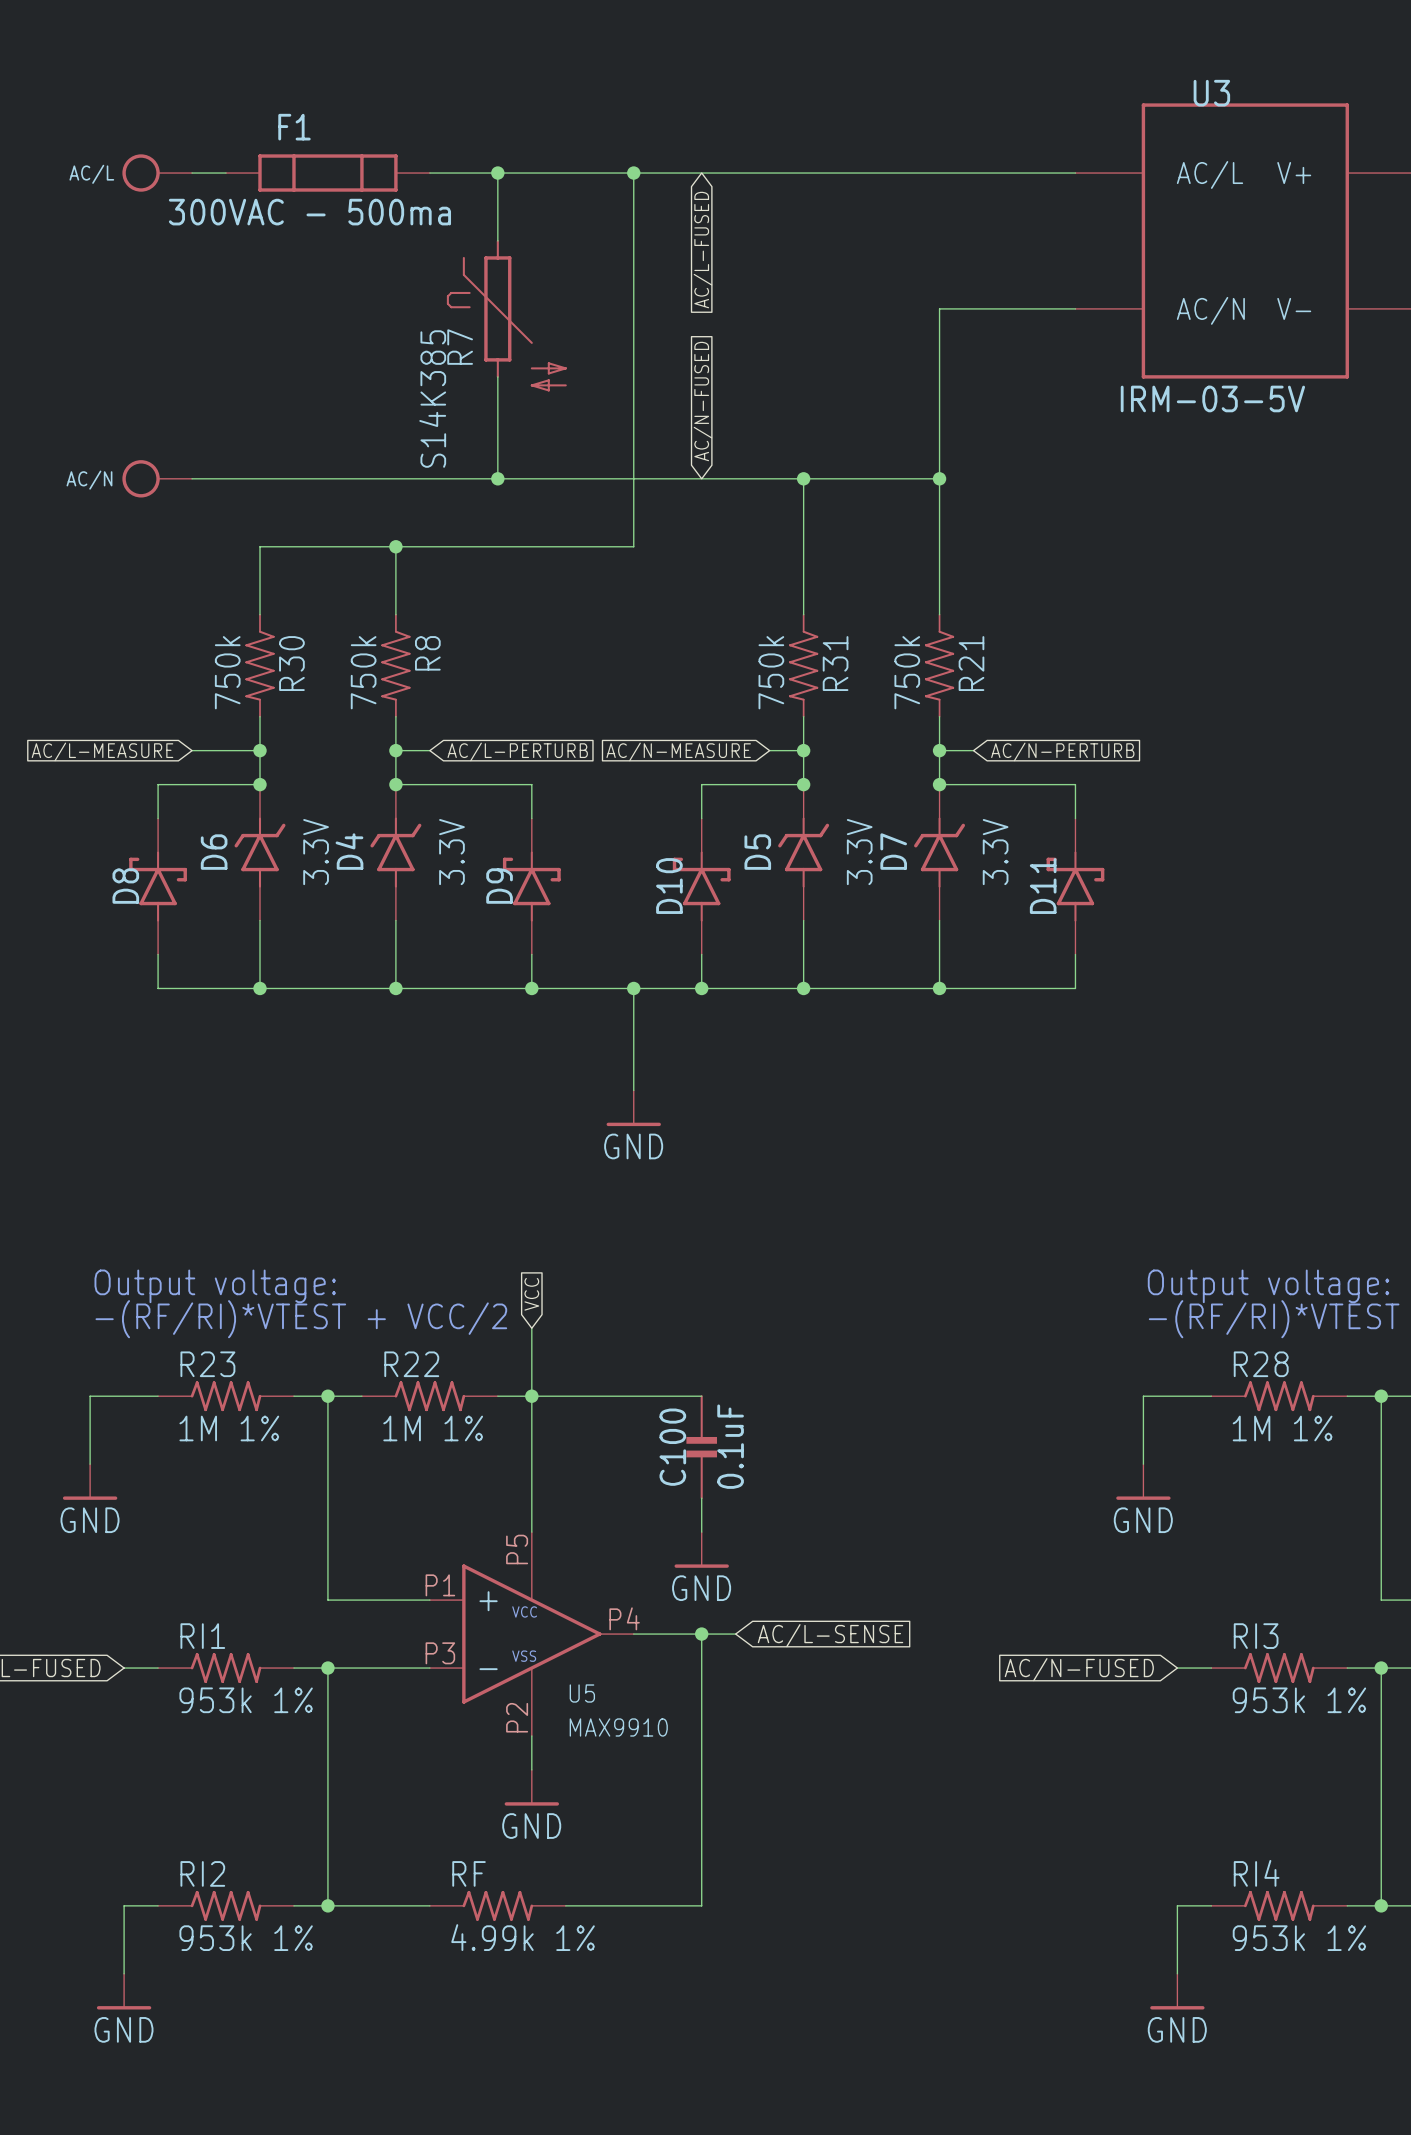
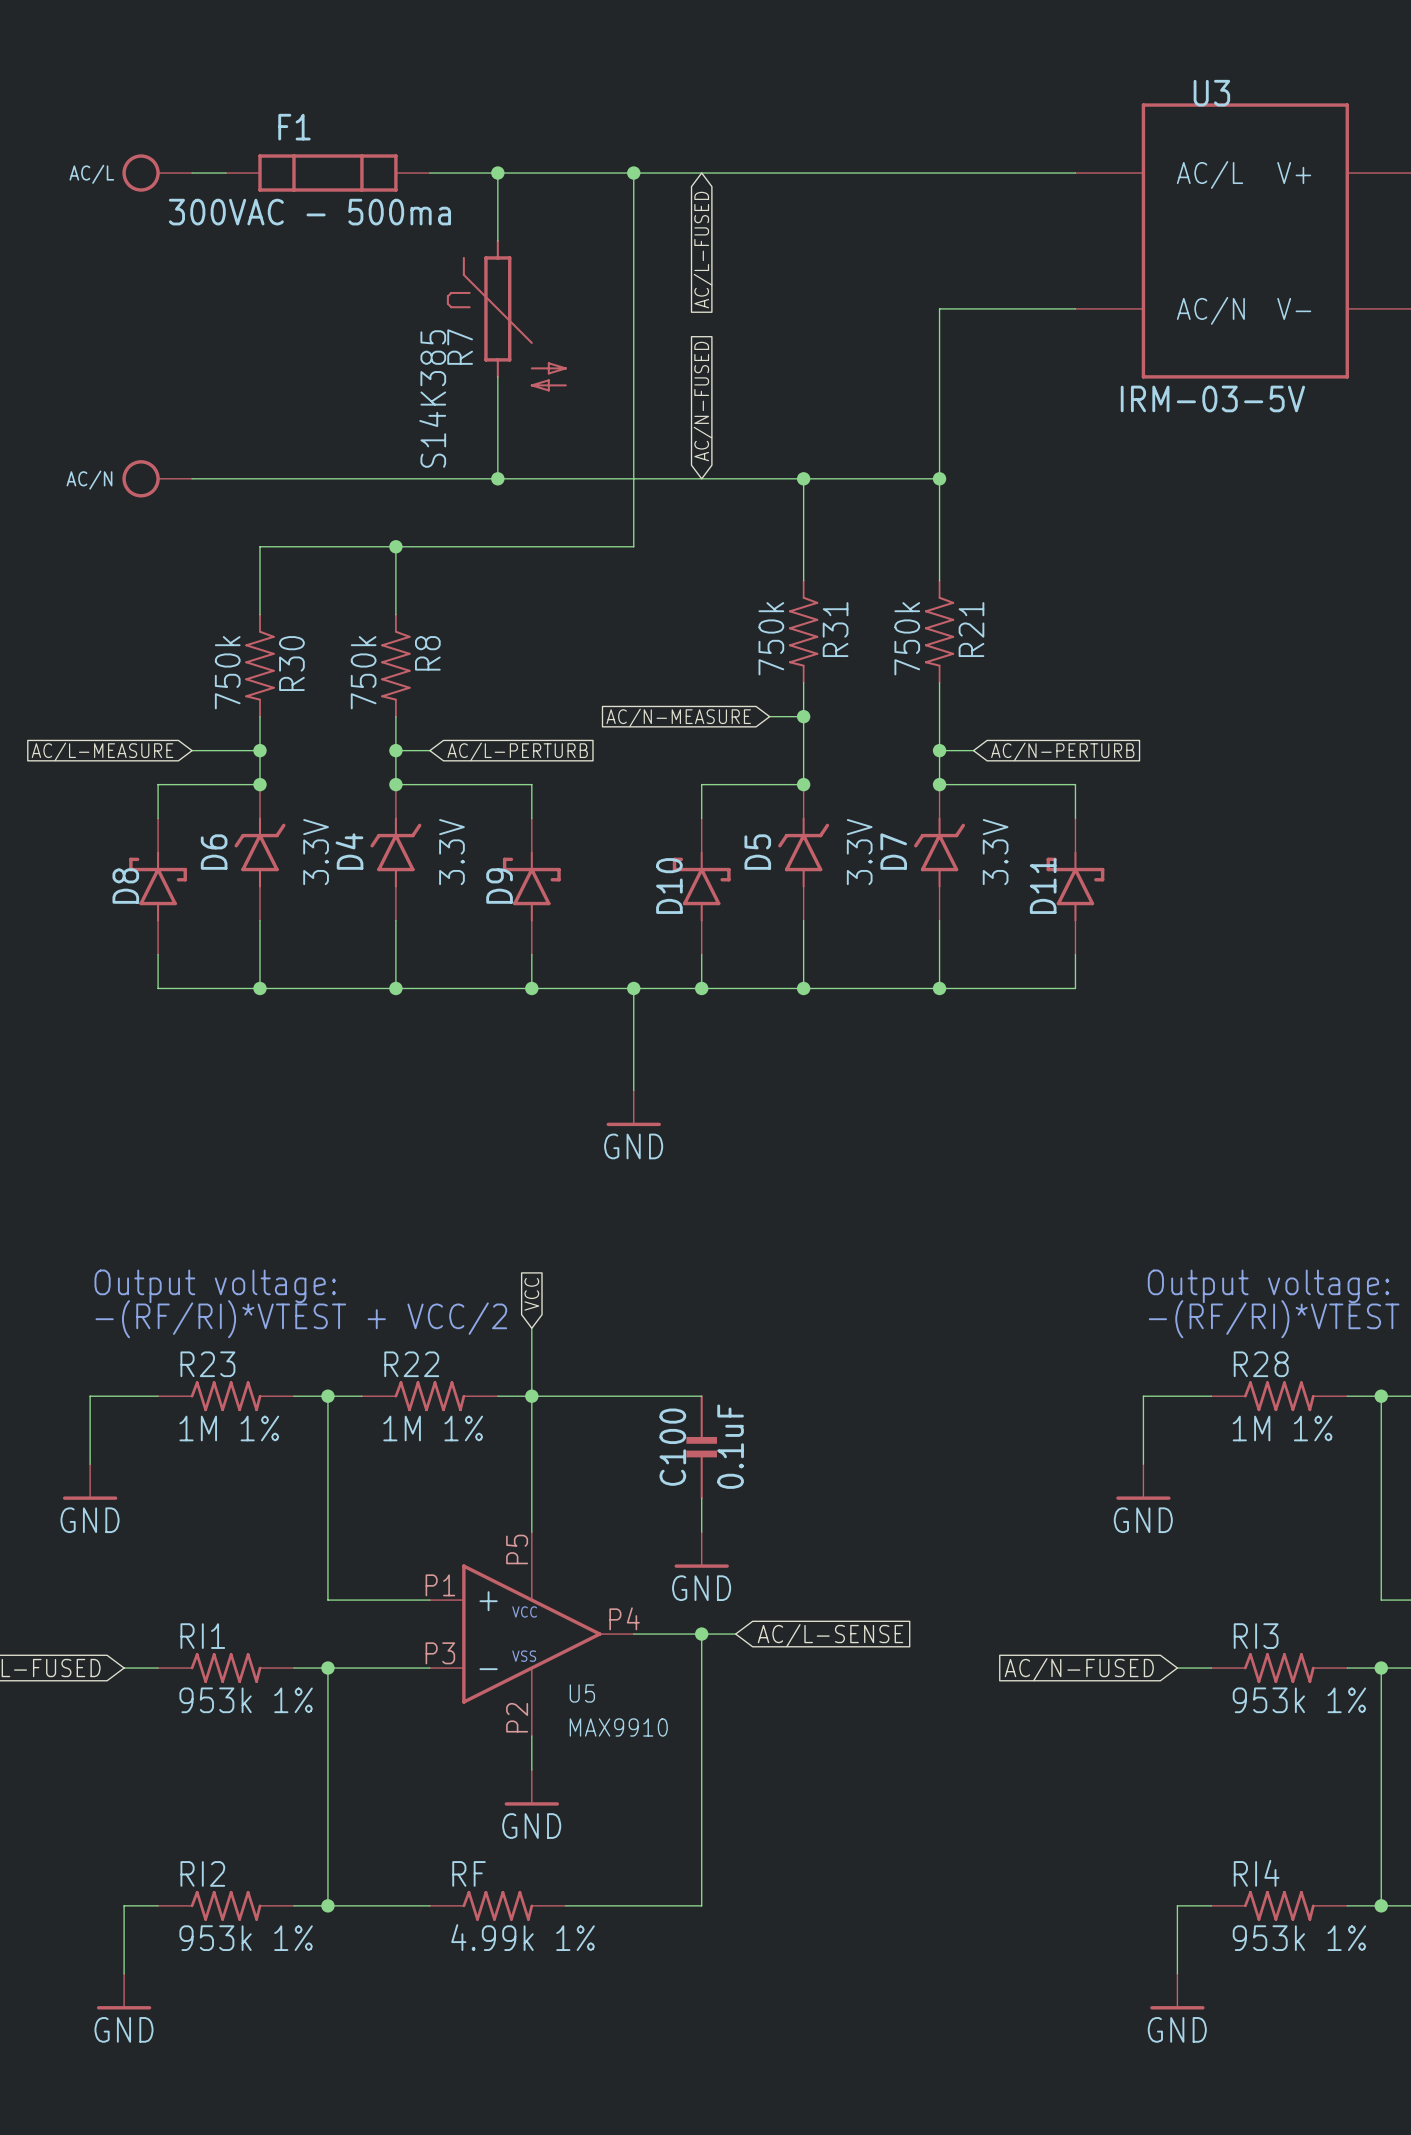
R31 position: (803, 665) -> (803, 631)
R21 position: (939, 665) -> (939, 631)
wire: none -> (803, 682) (803, 716) (769, 716)
wire: (769, 750) (803, 750) -> none
junction position: (803, 750) -> (803, 716)
global label position: AC/N-MEASURE (678, 751) -> AC/N-MEASURE (678, 717)

